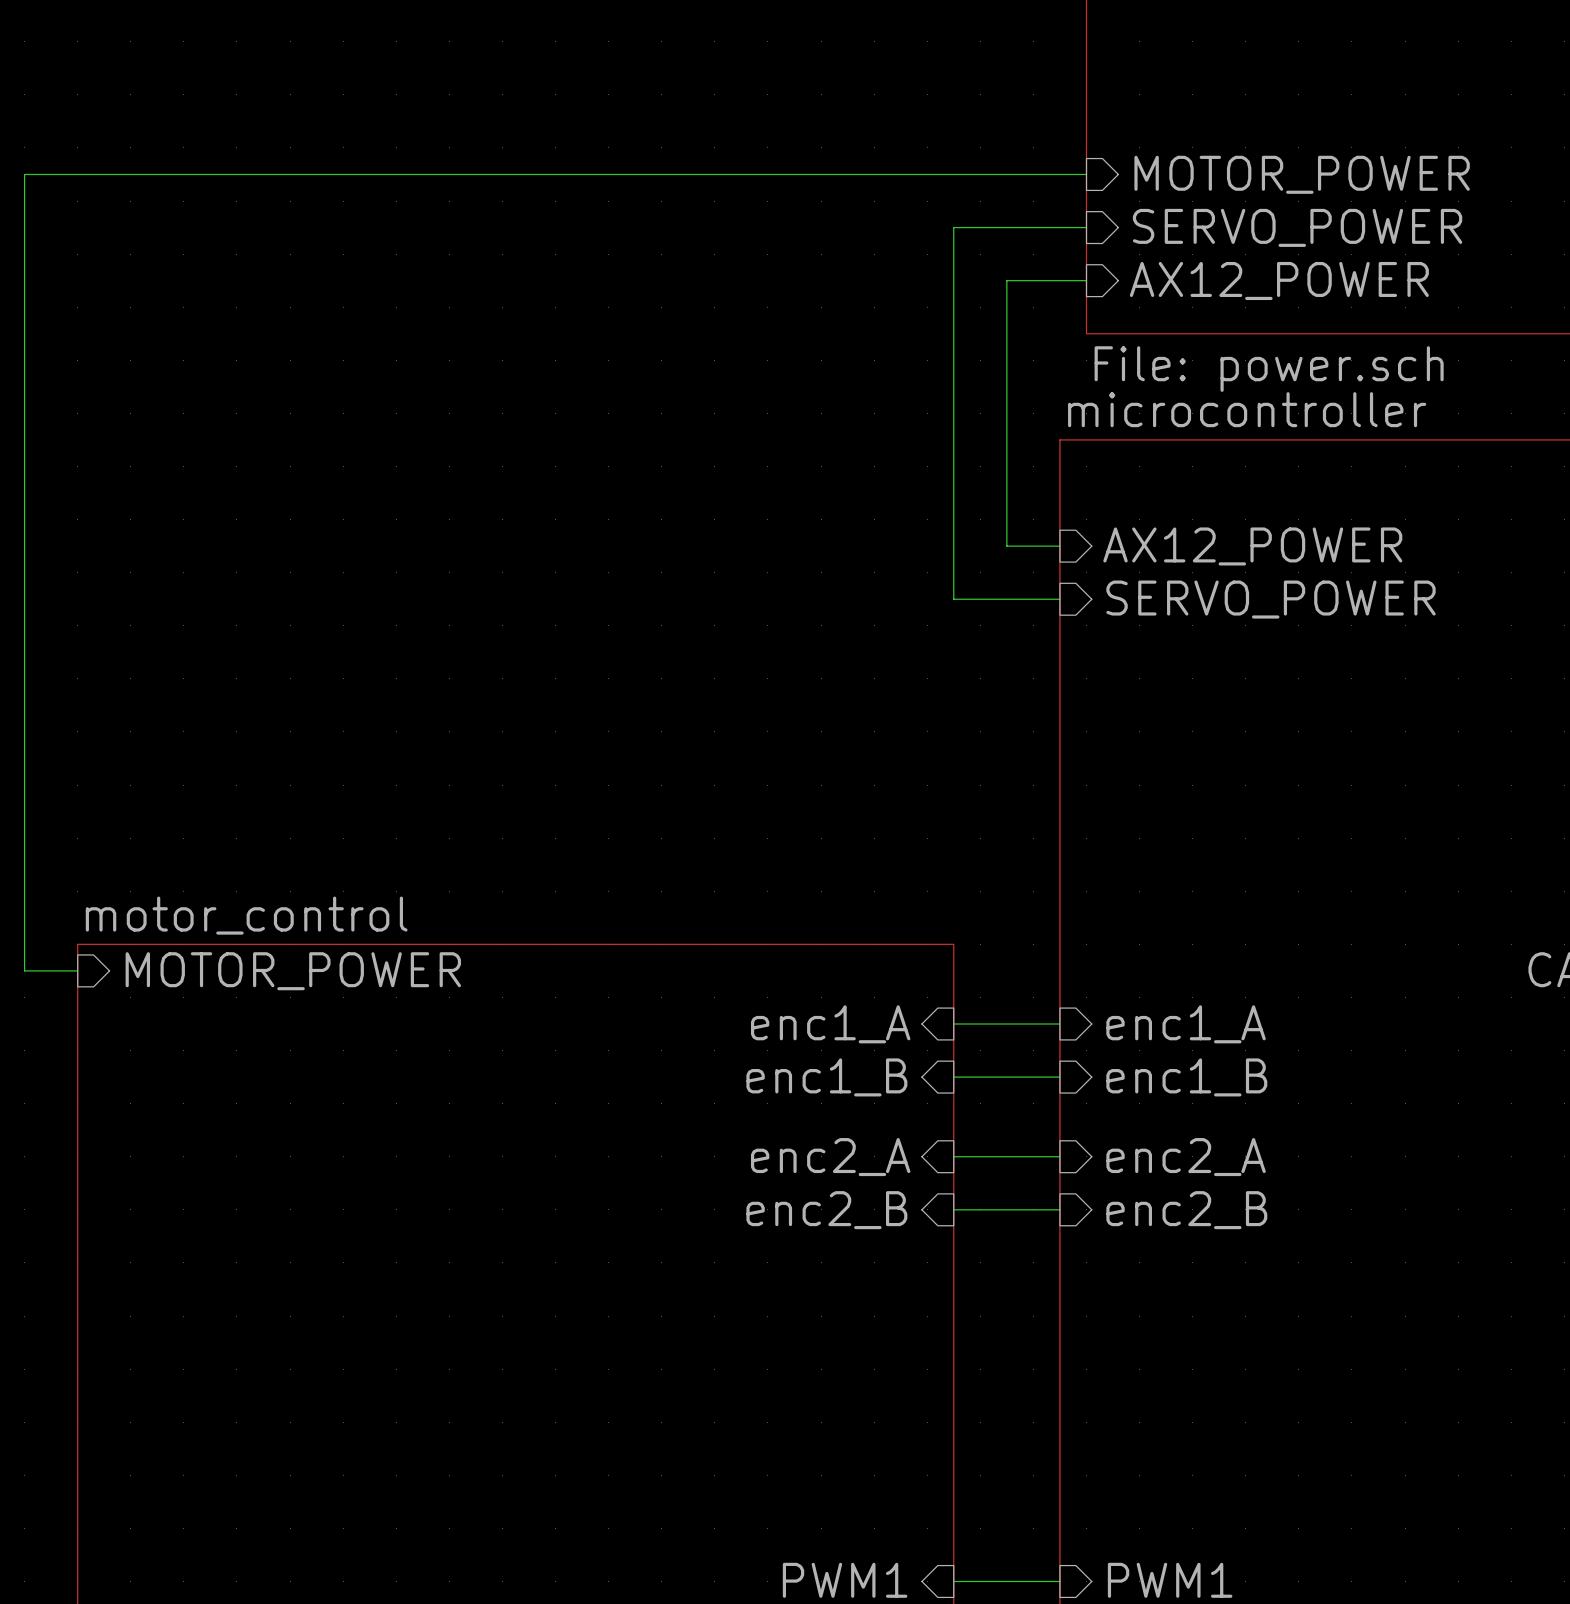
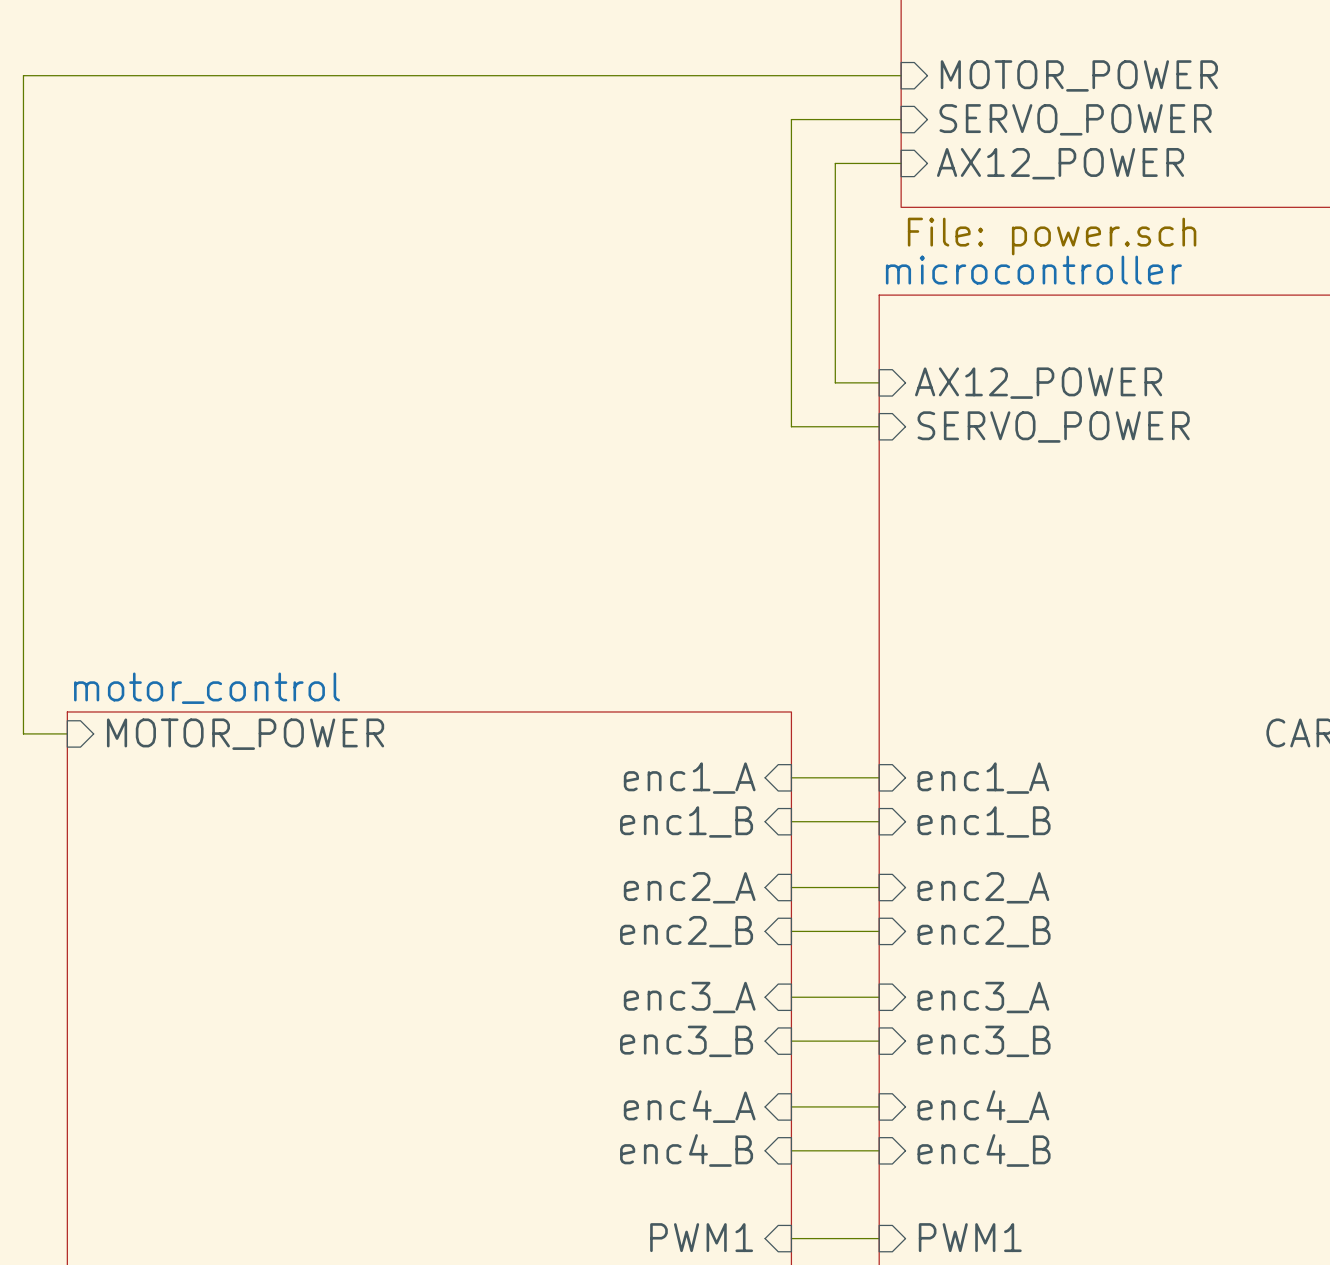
sheet pin: none -> enc3_A (689, 997)
wire: none -> (791, 997) (879, 997)
sheet pin: none -> enc3_A (983, 997)
sheet pin: none -> enc3_B (686, 1041)
wire: none -> (791, 1041) (879, 1041)
sheet pin: none -> enc3_B (984, 1041)
sheet pin: none -> enc4_A (689, 1106)
sheet pin: none -> enc4_A (983, 1106)
wire: none -> (791, 1106) (879, 1106)
sheet pin: none -> enc4_B (686, 1150)
sheet pin: none -> enc4_B (984, 1150)
wire: none -> (791, 1150) (879, 1150)

